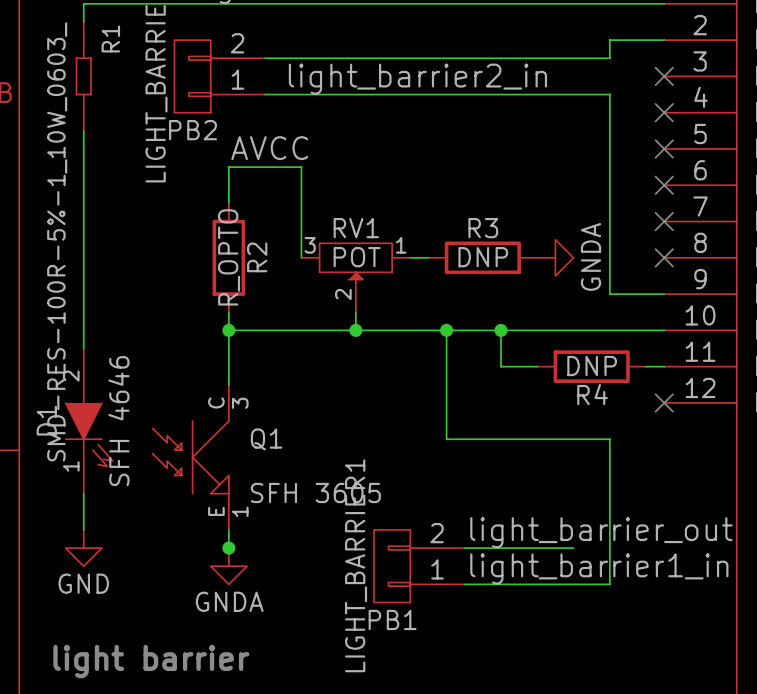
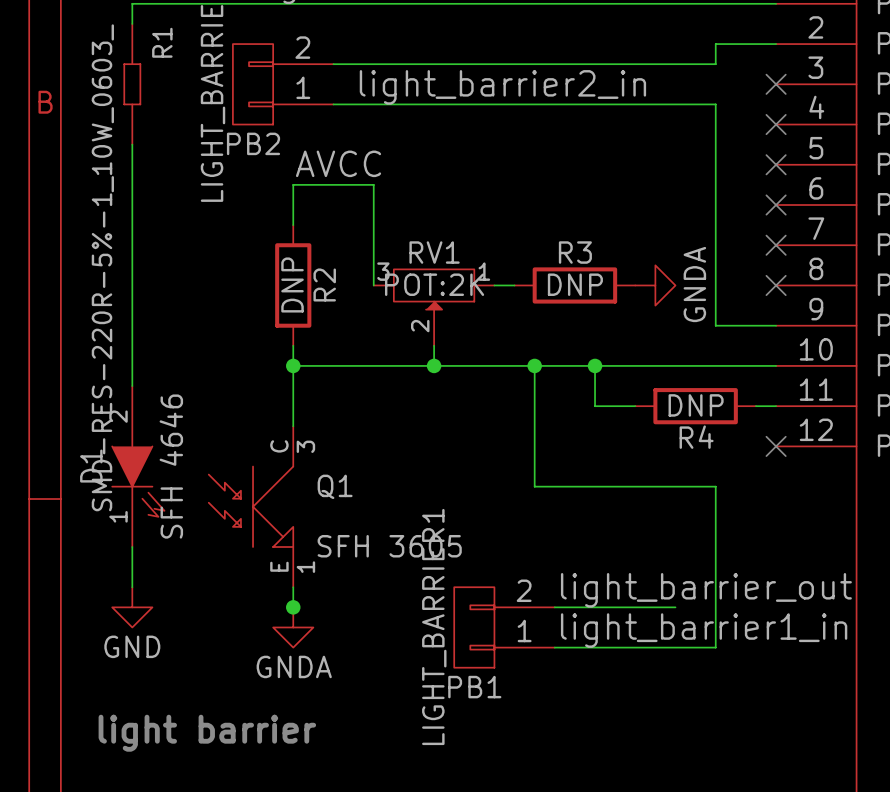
R1 value: SMD-RES-100R-5%-1_10W_0603_ (57, 241) -> SMD-RES-220R-5%-1_10W_0603_ (102, 267)
R2 value: R_OPTO (229, 257) -> DNP (292, 284)
RV1 value: POT (357, 257) -> POT:2K (434, 284)

